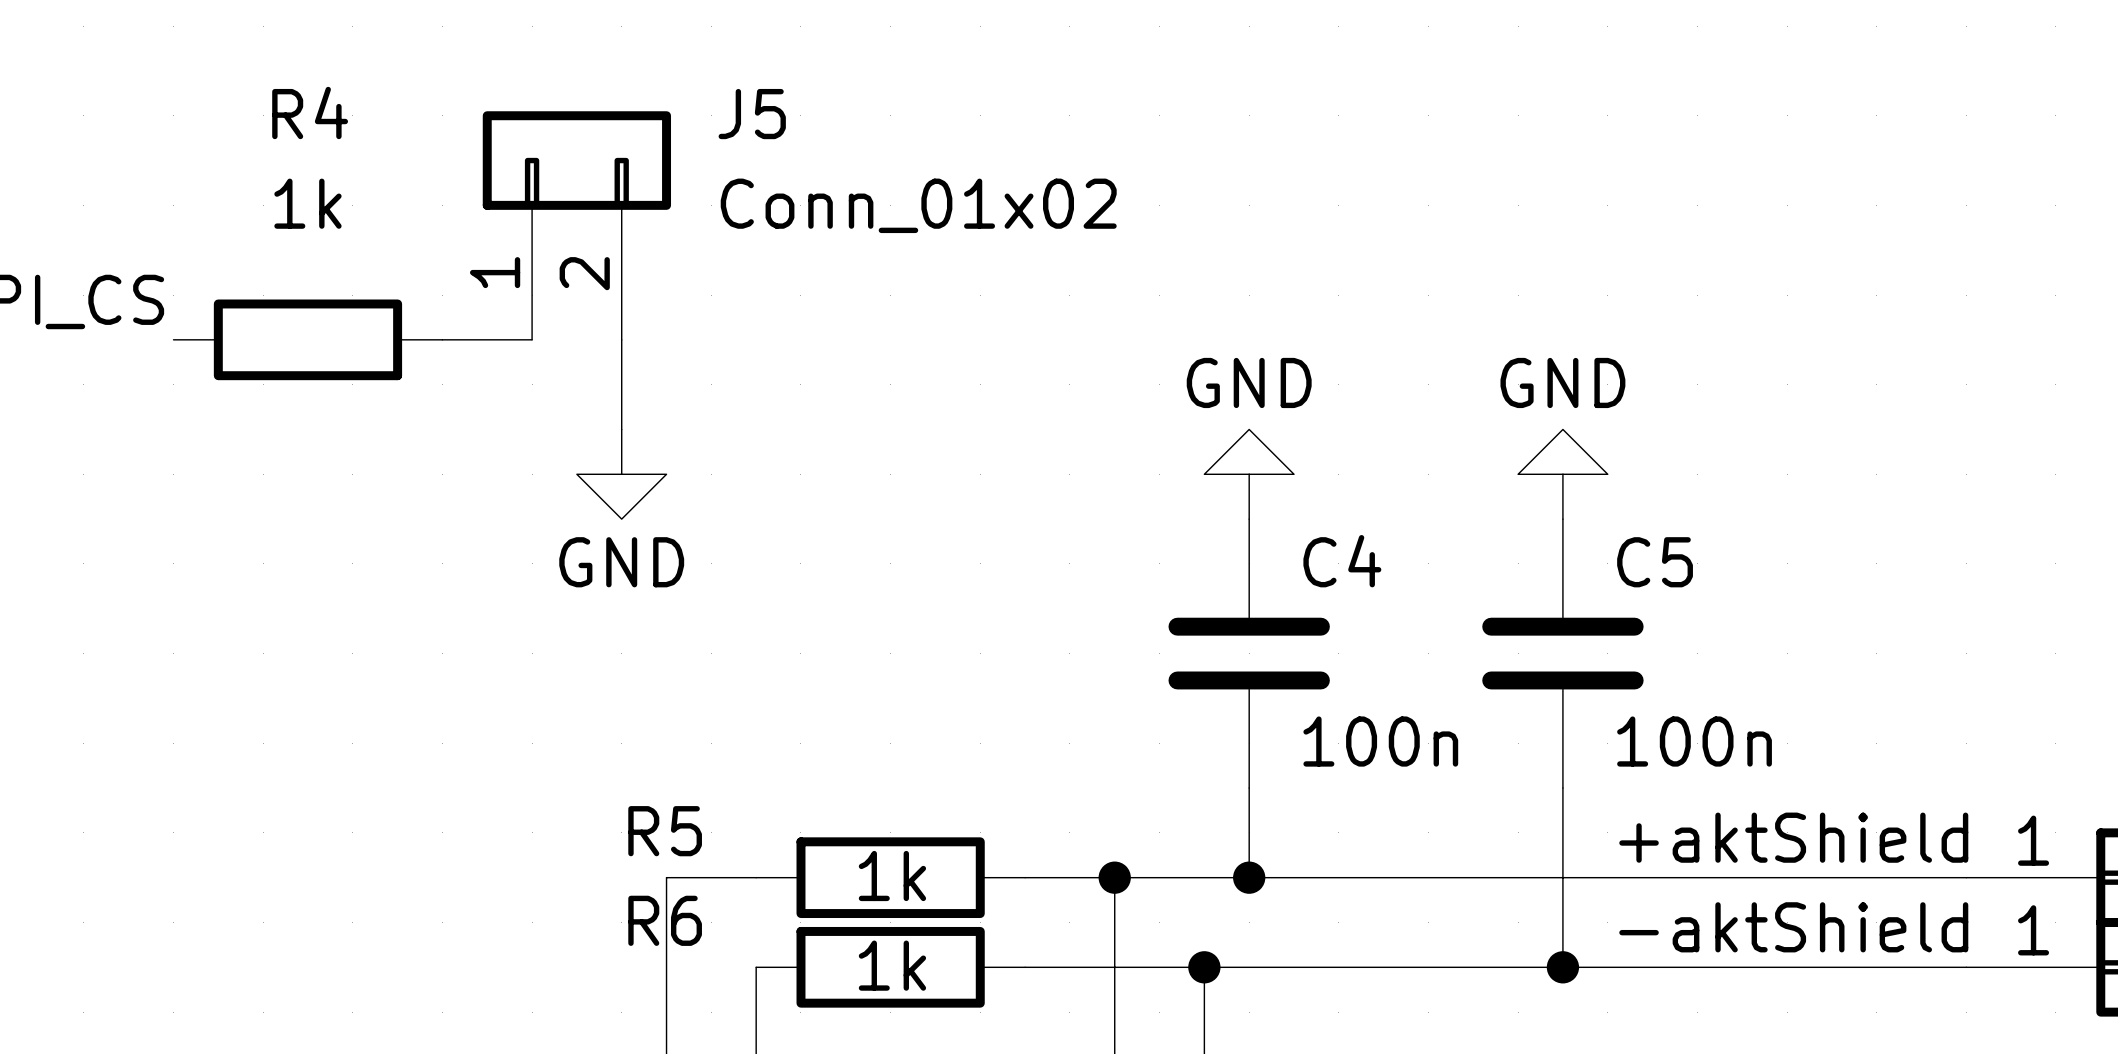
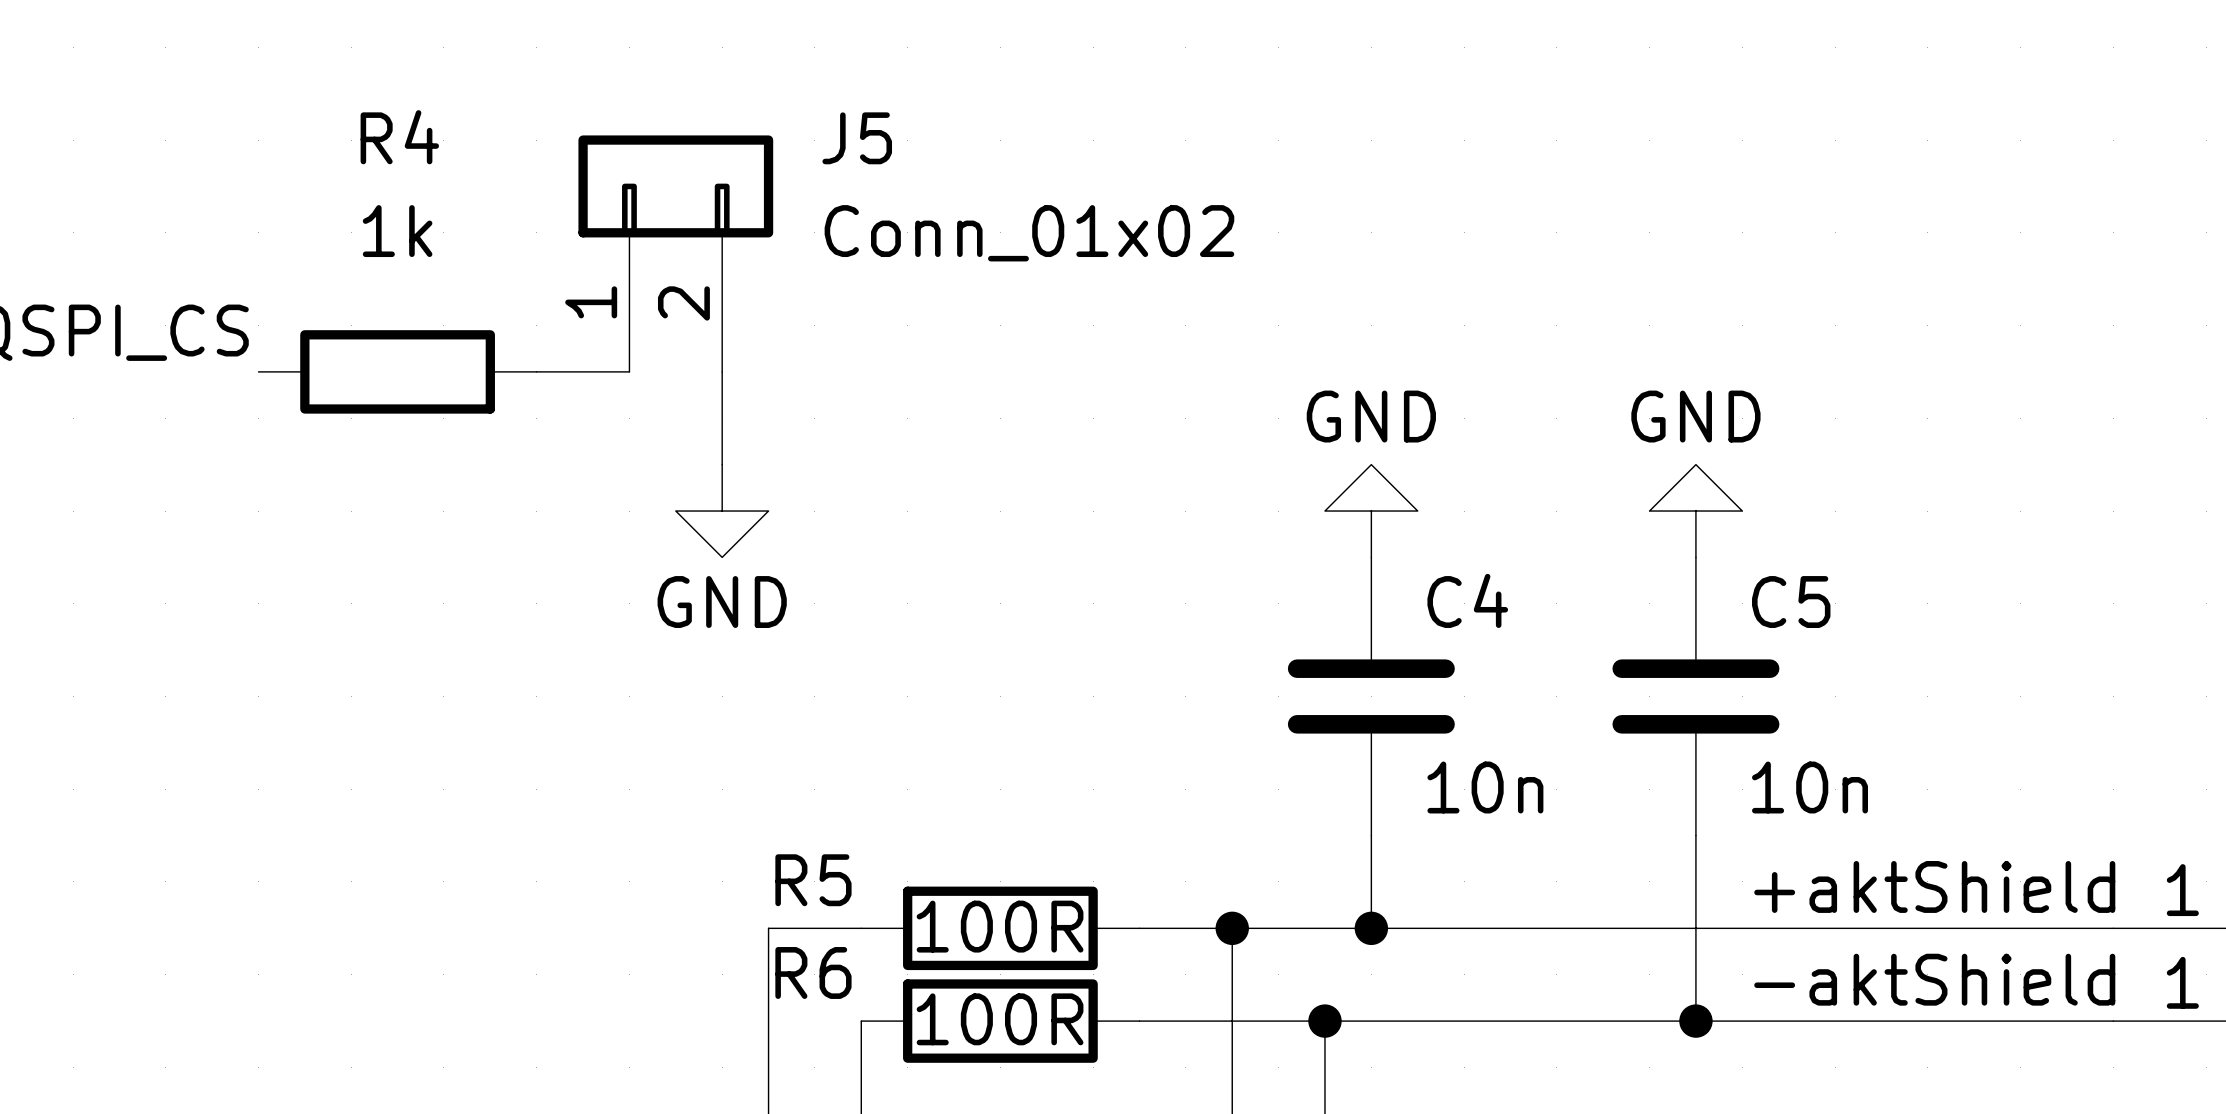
C4 value: 100n (1380, 741) -> 10n (1485, 787)
C5 value: 100n (1694, 741) -> 10n (1810, 787)
R5 name position: R5 (665, 831) -> R5 (813, 880)
R5 value: 1k (892, 876) -> 100R (1000, 926)
R6 name position: R6 (665, 920) -> R6 (813, 972)
R6 value: 1k (892, 965) -> 100R (1000, 1019)

